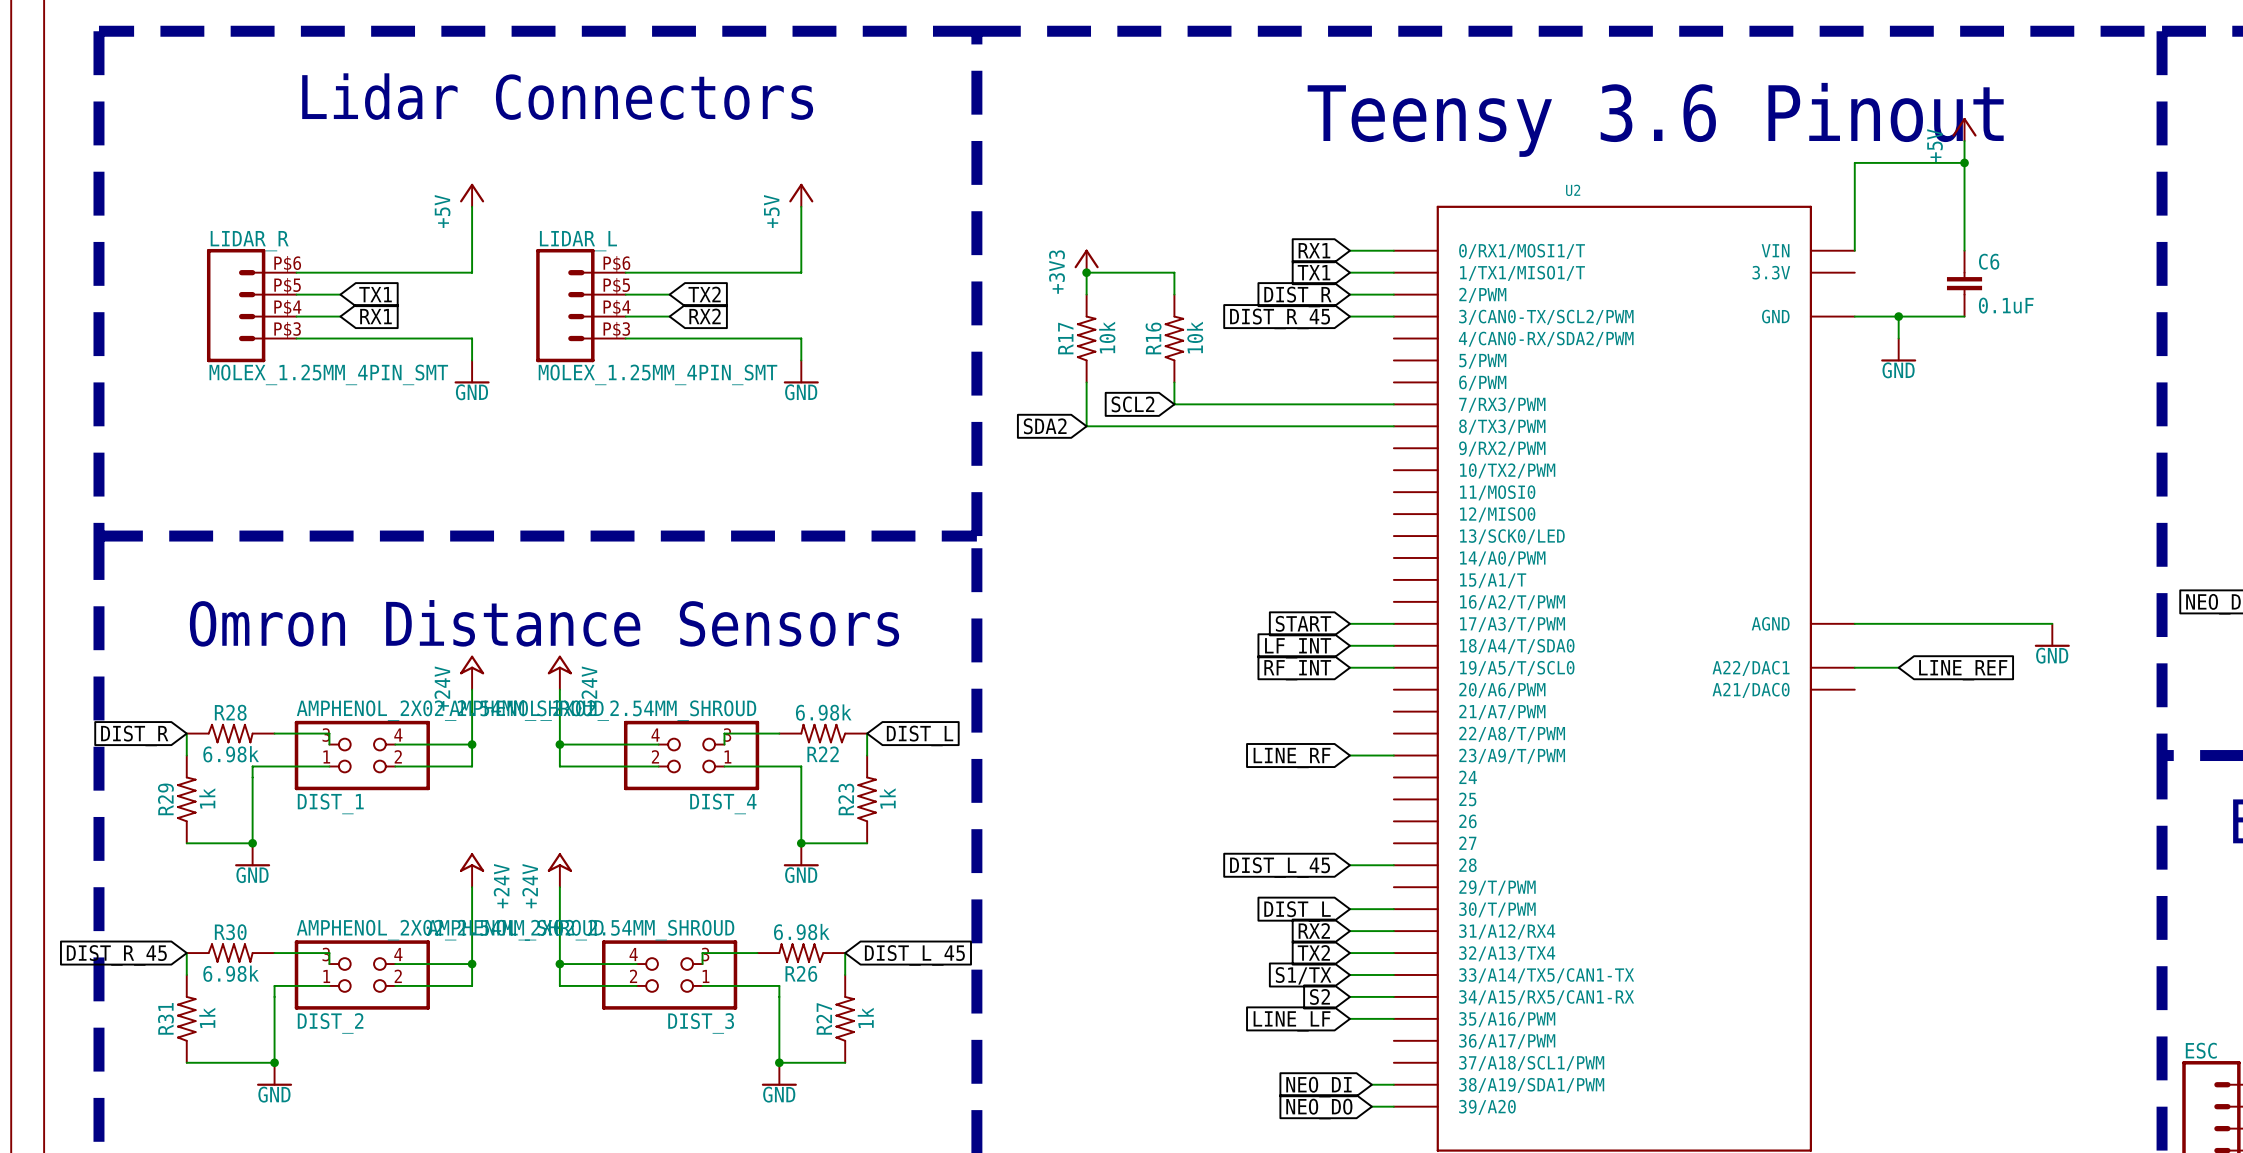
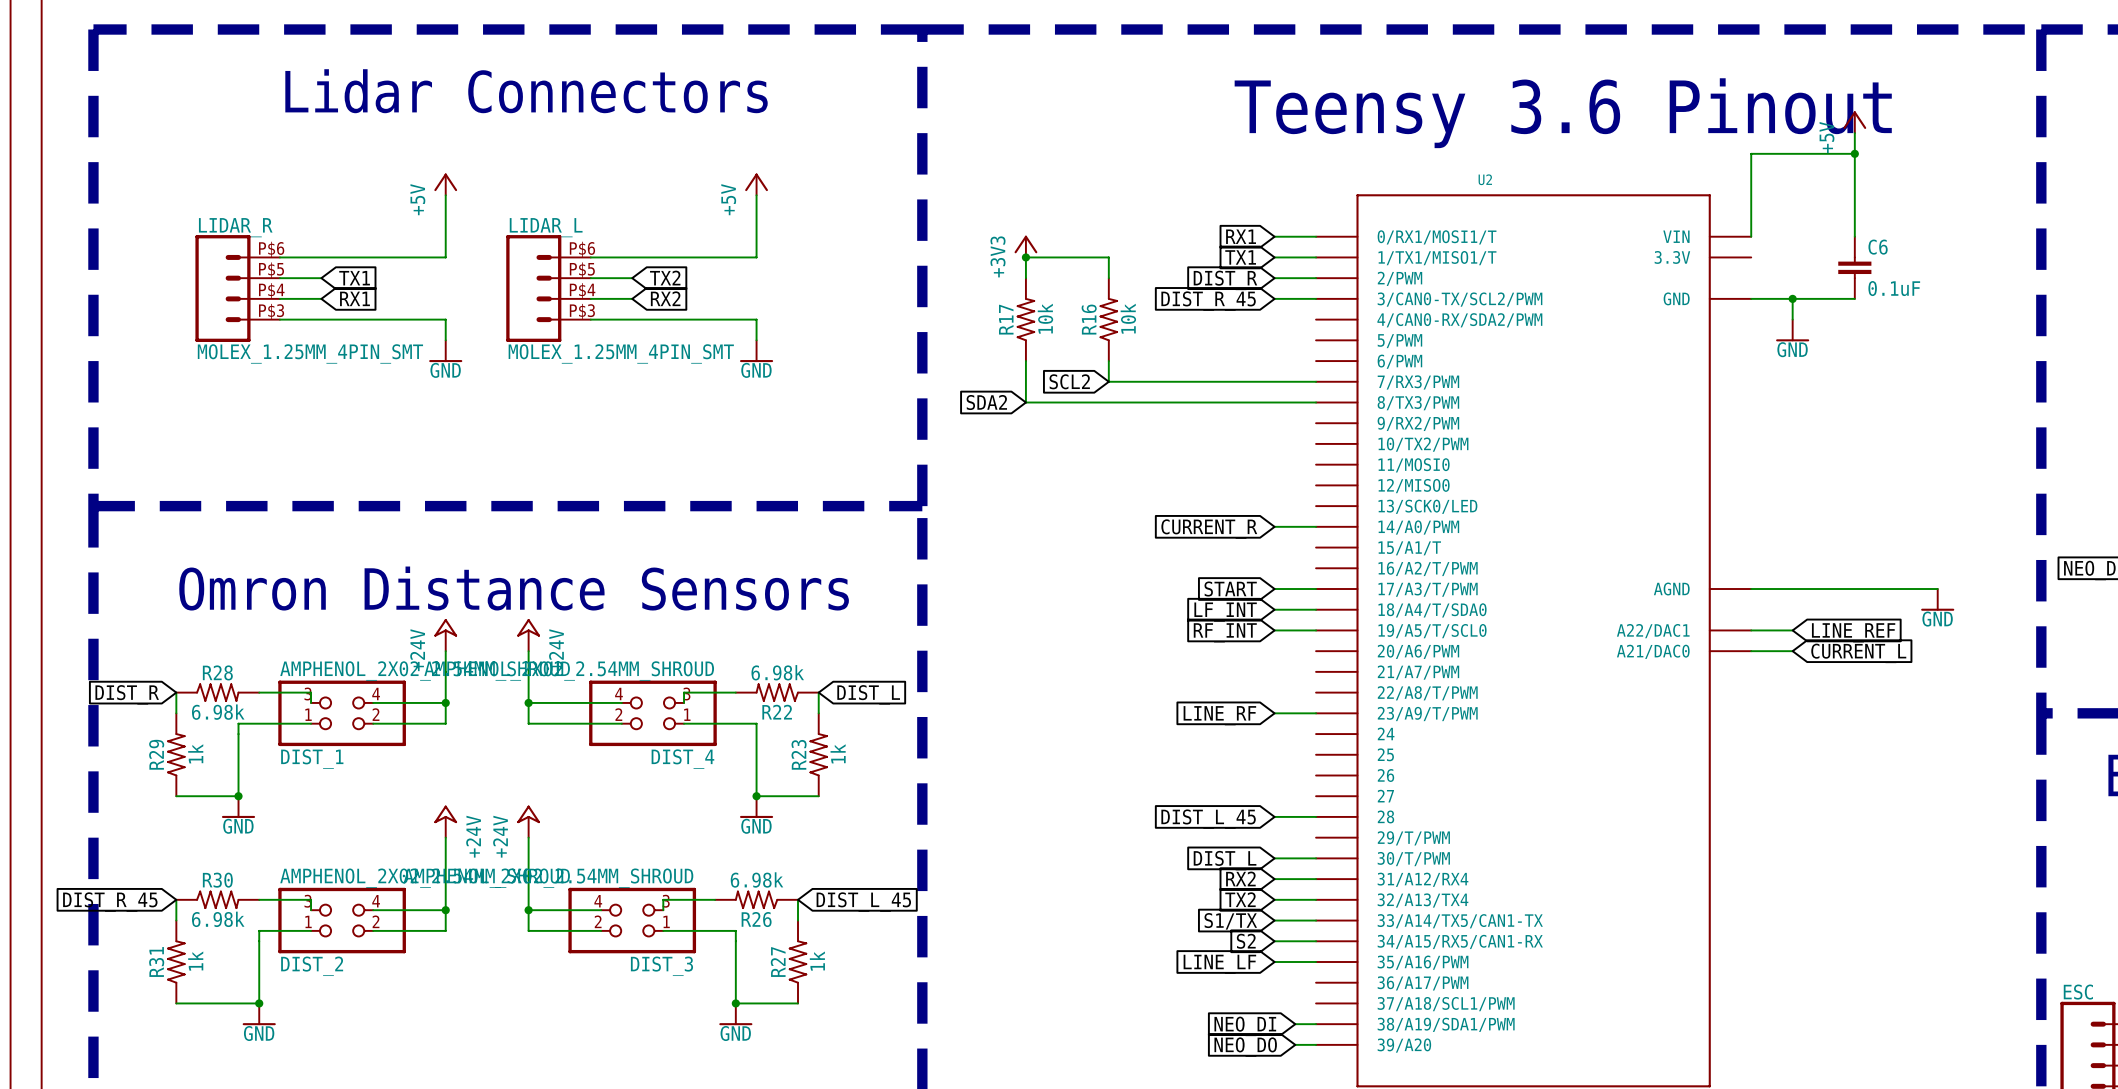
wire: none -> (1274, 526) (1316, 526)
global label: none -> CURRENT_R (1209, 529)
wire: none -> (1751, 651) (1792, 651)
global label: none -> CURRENT_L (1858, 653)

